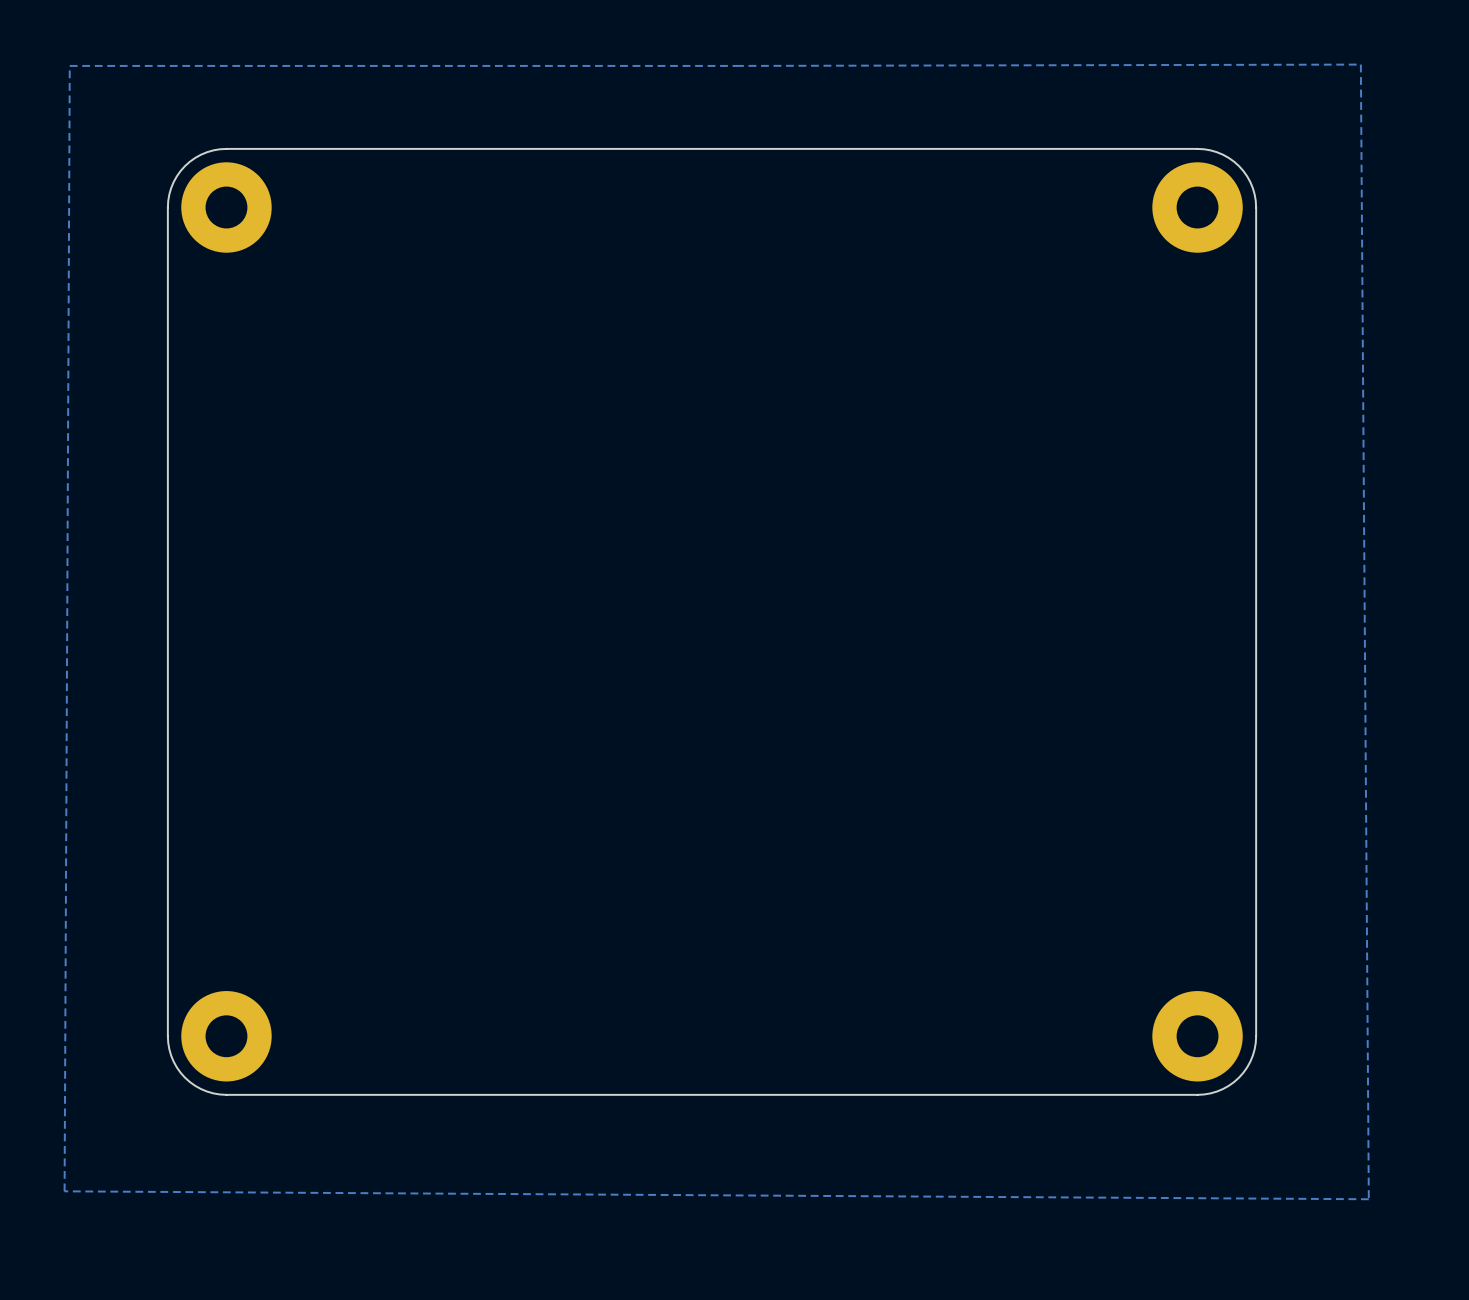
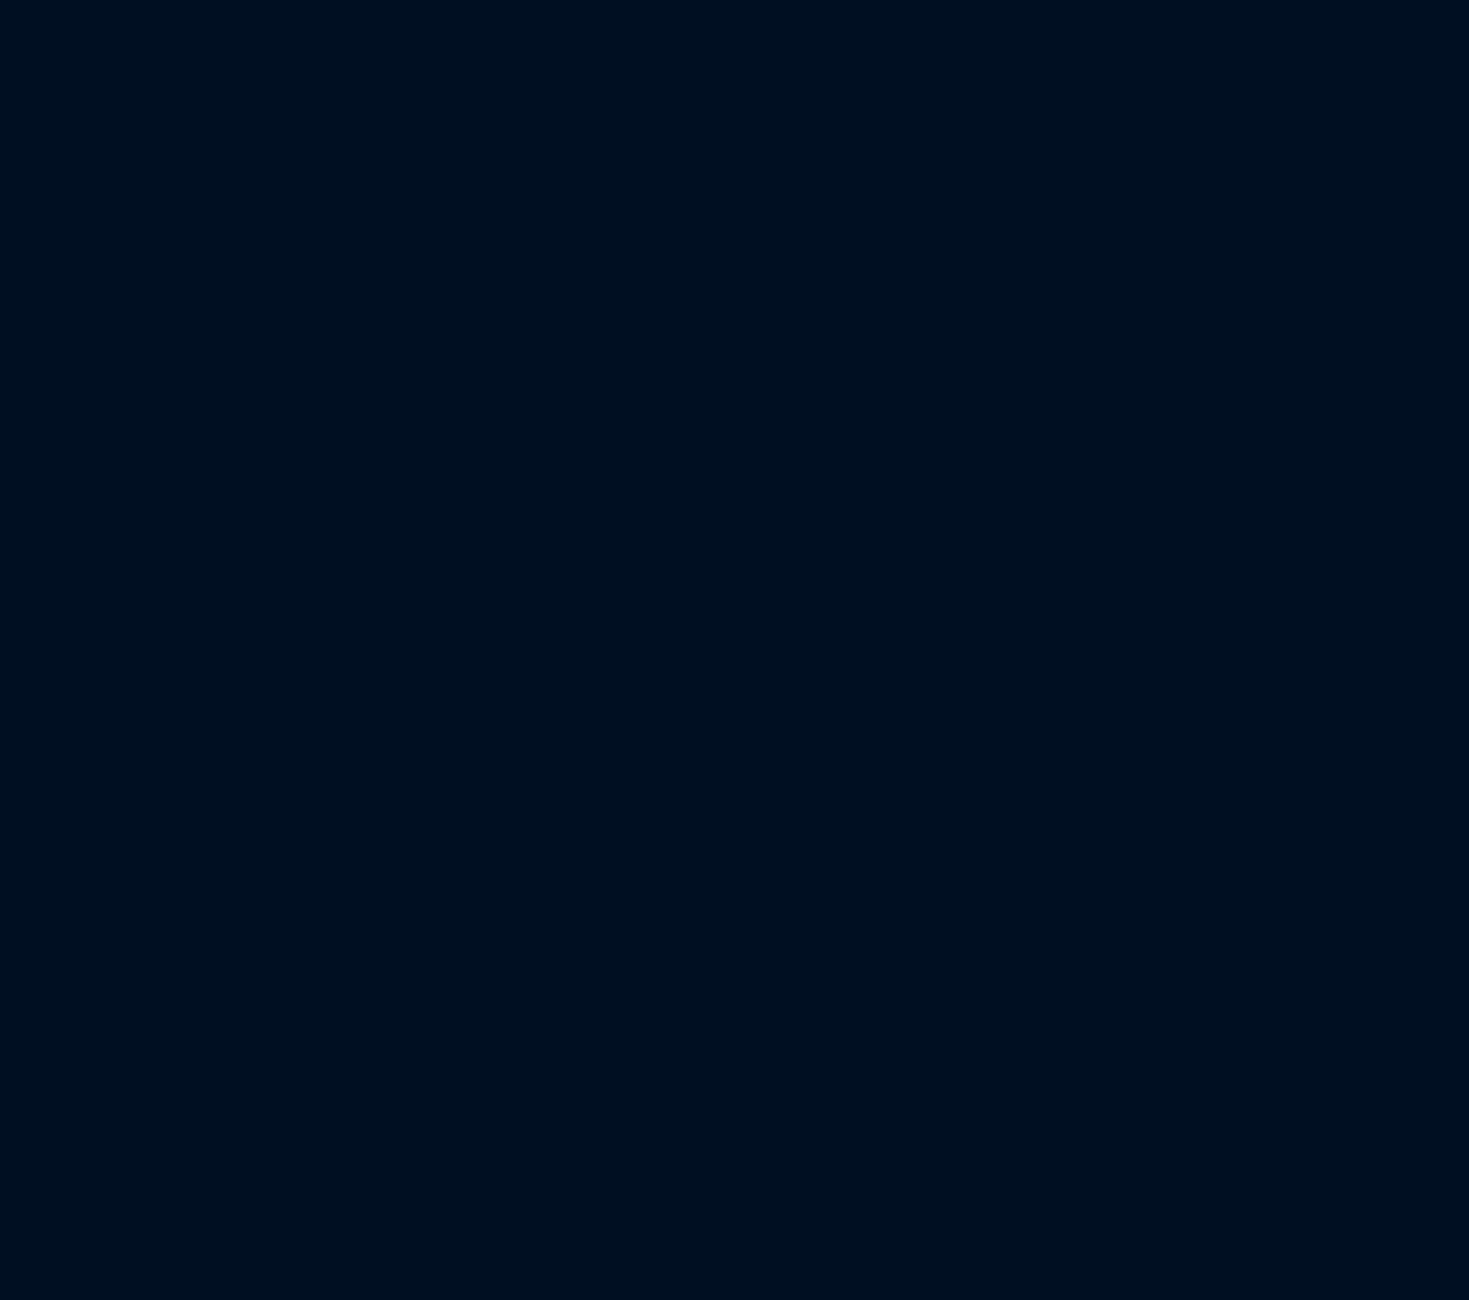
bottom zone outline: (1360, 64) (69, 65) (64, 1191) (1368, 1199) (1360, 64) -> none
board edge: (226, 148) (1197, 148) (1216, 152) (1238, 166) (1252, 188) (1256, 207) (1256, 1036) (1252, 1055) (1238, 1077) (1216, 1091) (1197, 1094) (226, 1094) (207, 1091) (185, 1077) (171, 1055) (167, 1036) (167, 207) (171, 188) (185, 166) (207, 152) (226, 148) -> none
part: (226, 207) -> none
part: (1197, 207) -> none
part: (226, 1036) -> none
part: (1197, 1036) -> none

